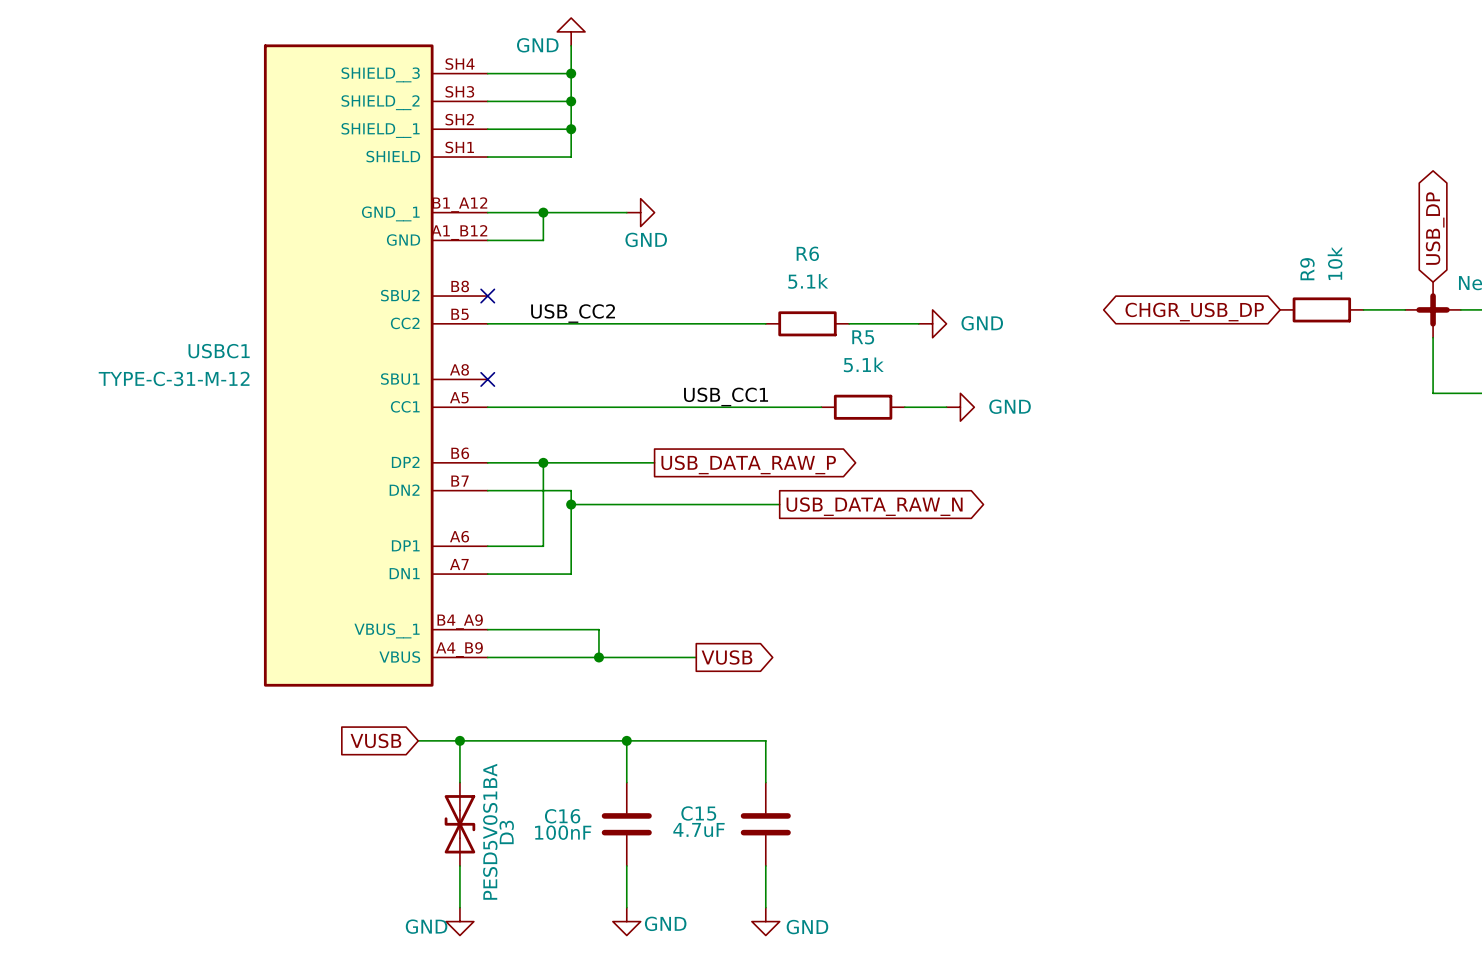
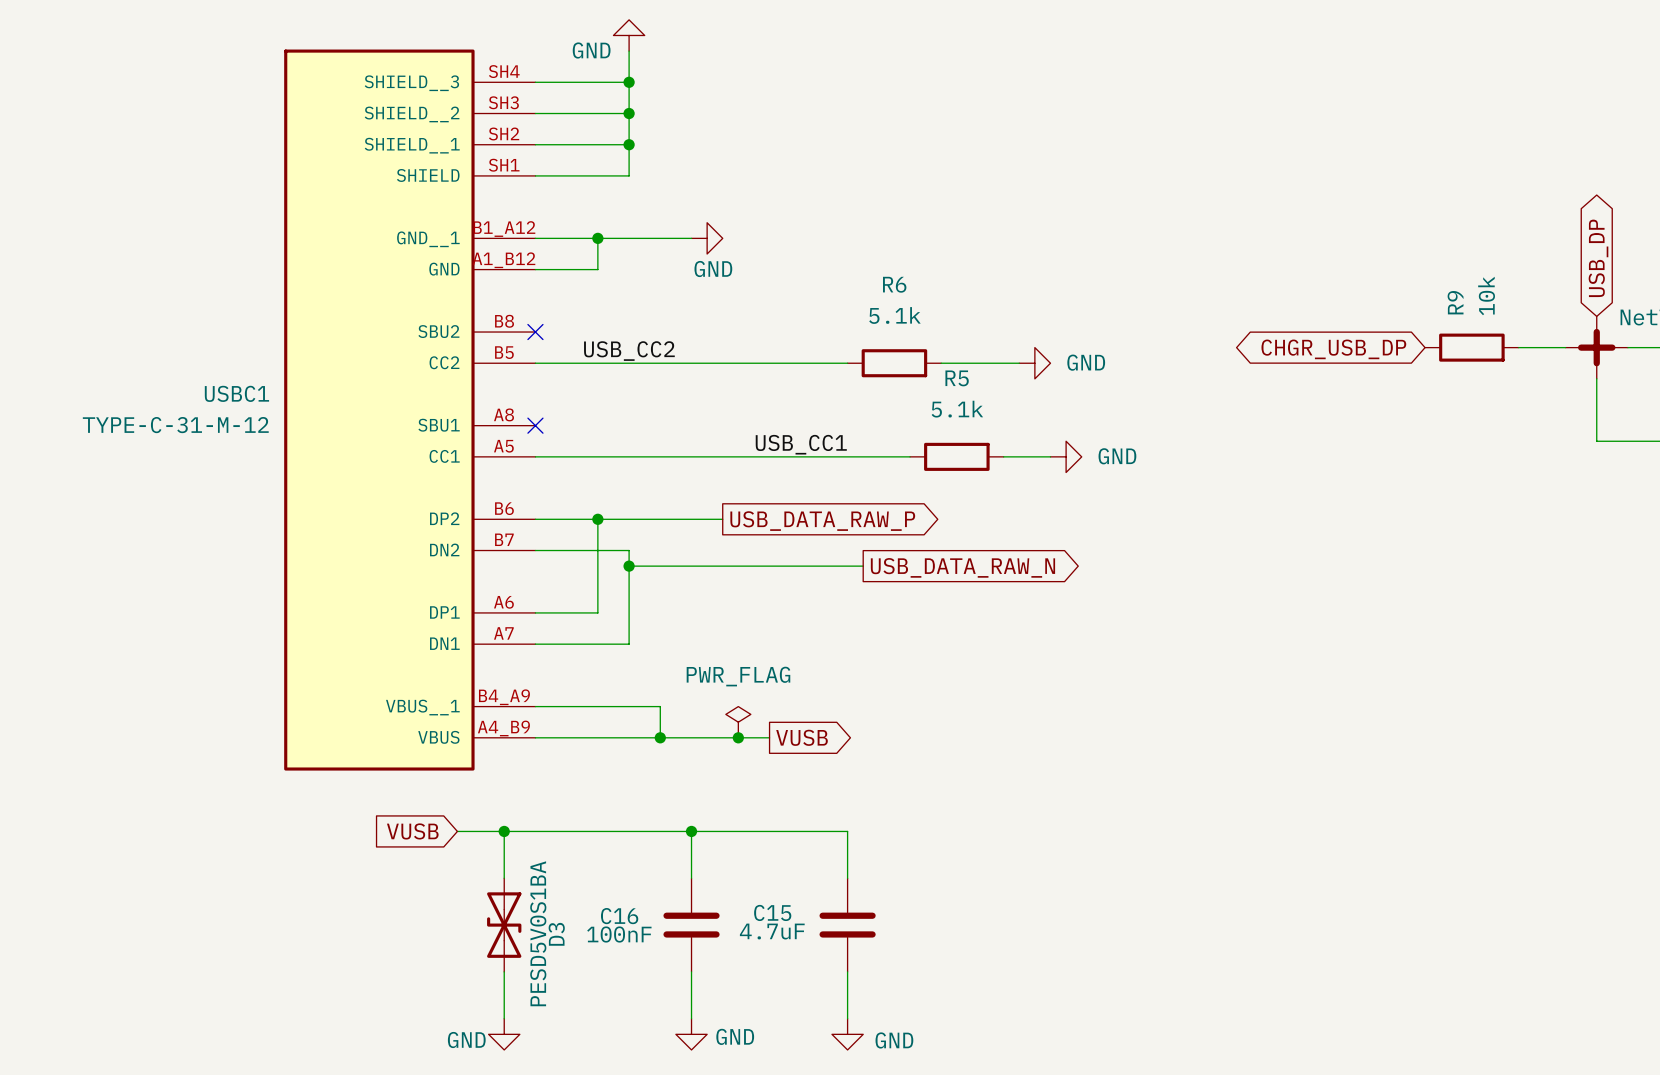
power symbol: none -> PWR_FLAG (738, 722)
junction: none -> (738, 737)

